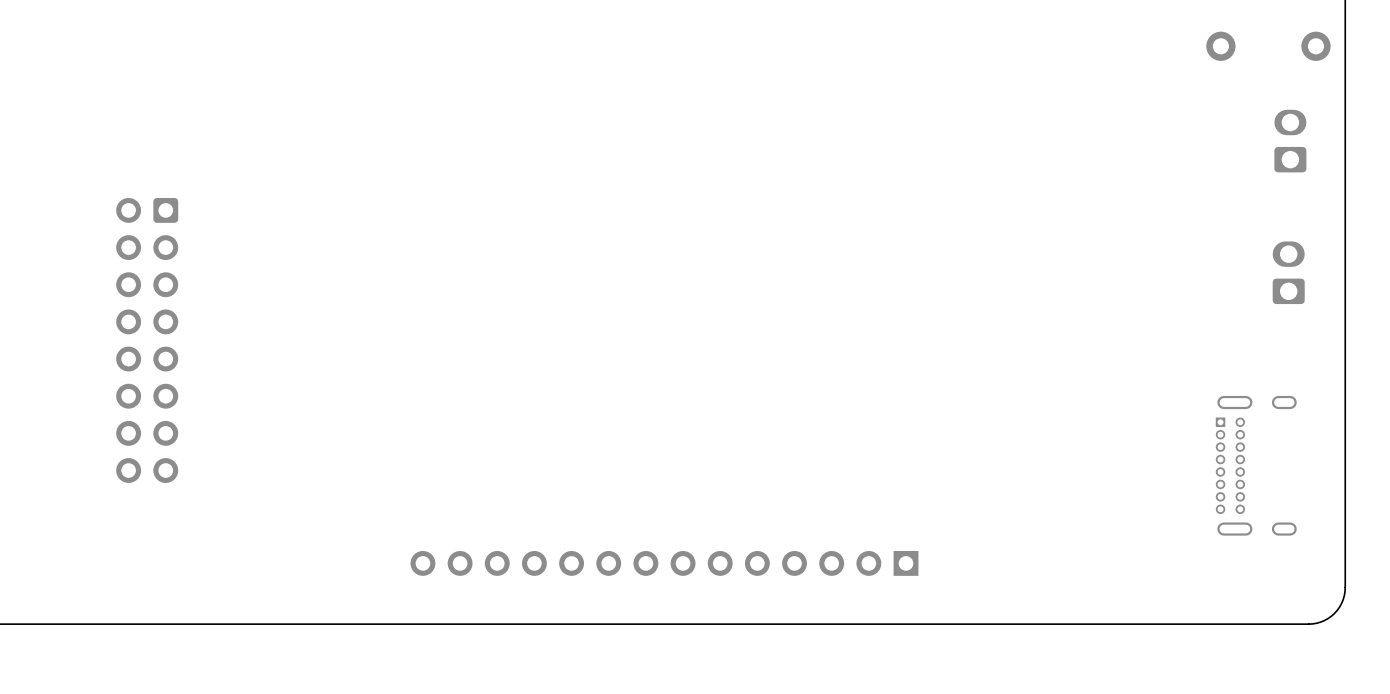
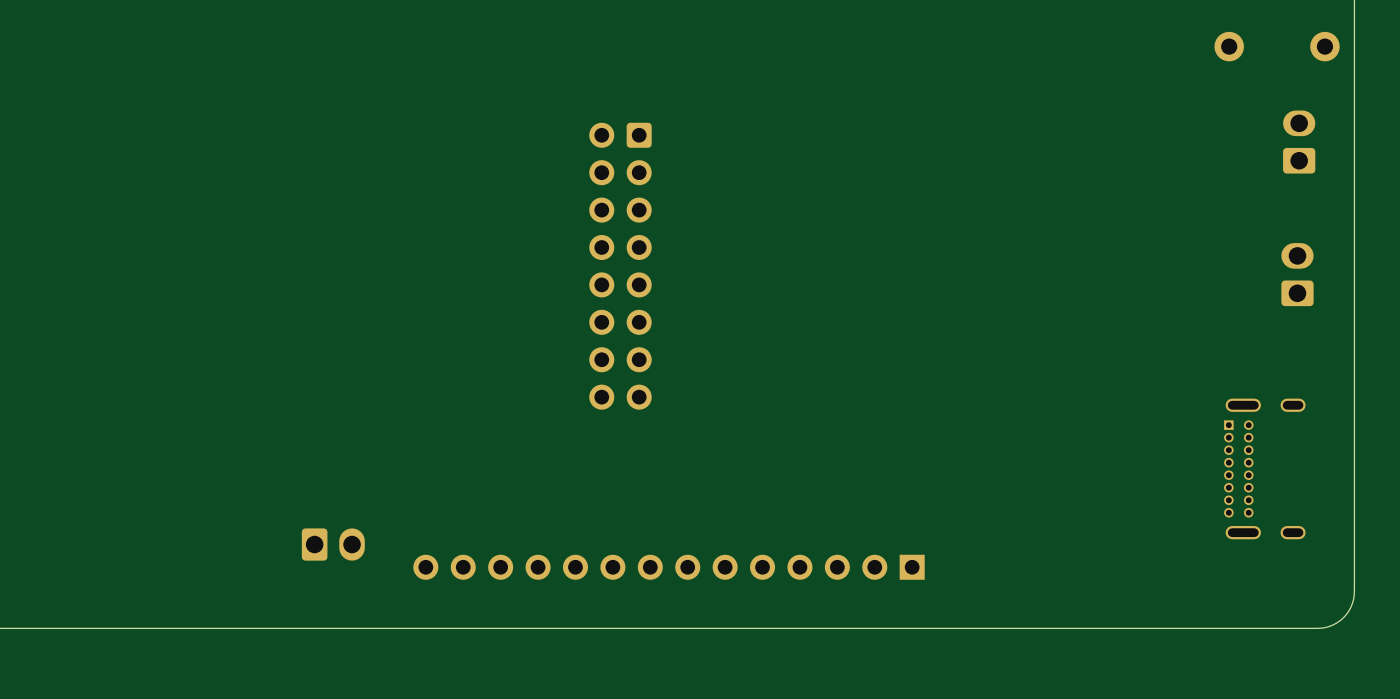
part: none -> (620, 266)
part: (147, 340) -> none
part: none -> (333, 544)

